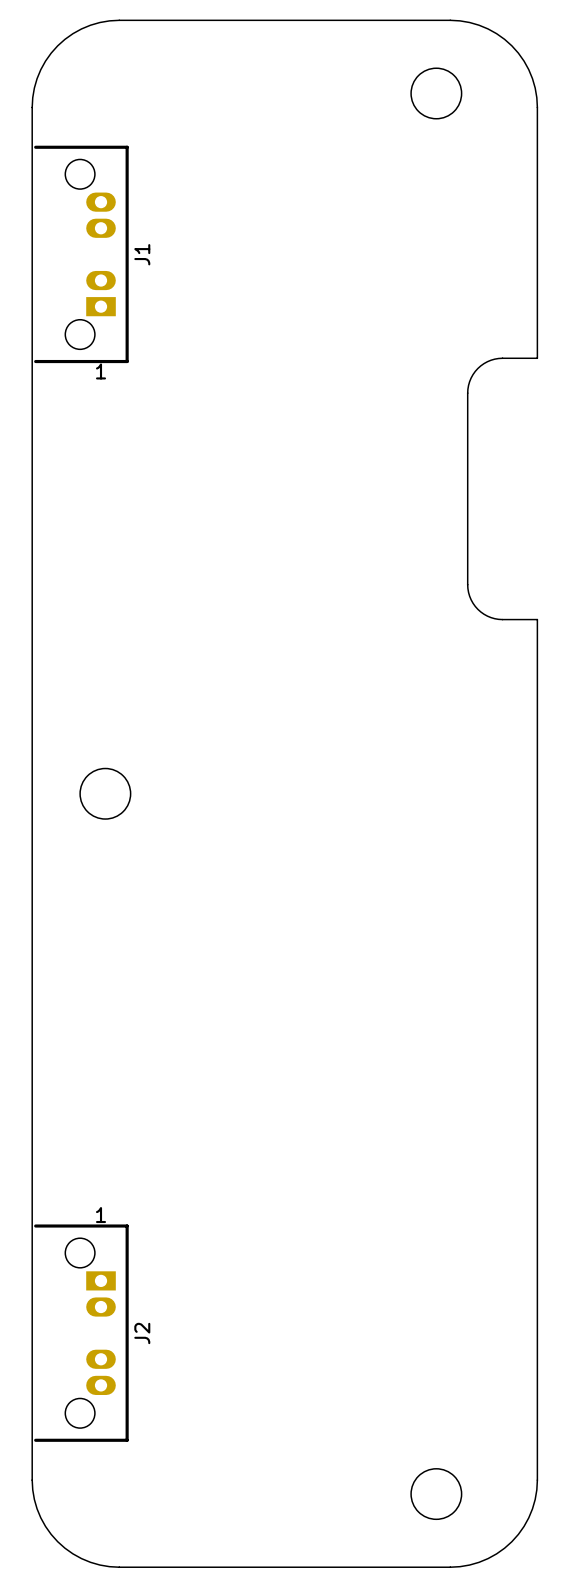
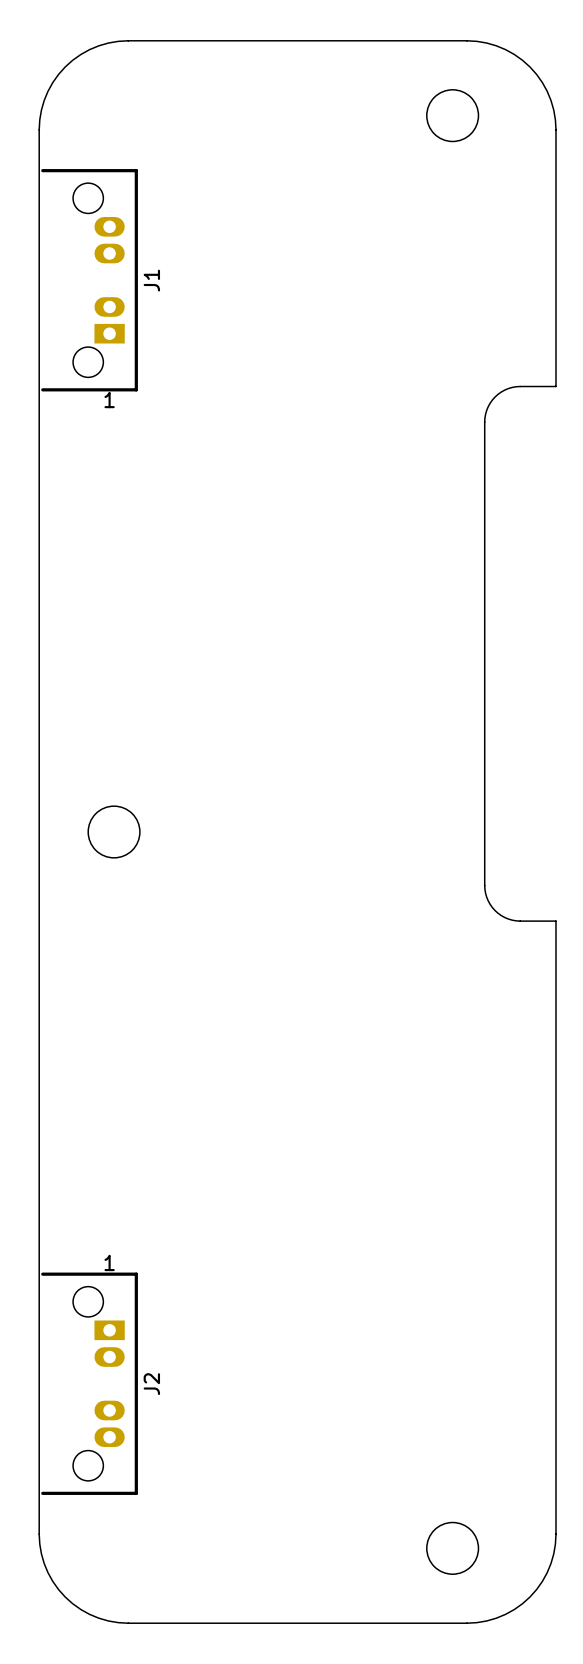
board edge: (467, 584) (473, 603) (487, 616) (498, 619) (537, 619) (537, 880) -> (484, 618) (485, 893) (492, 907) (508, 919) (520, 921) (555, 921)

